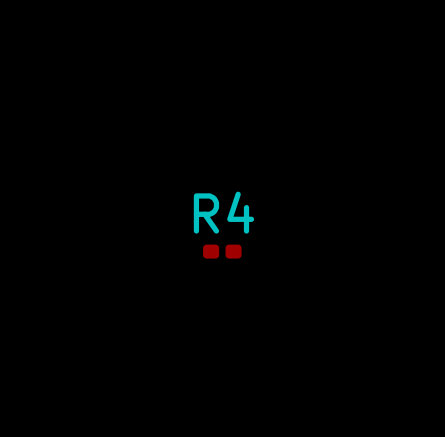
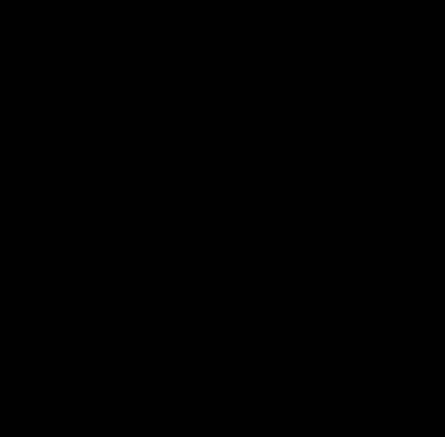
R4: (222, 251) -> none

